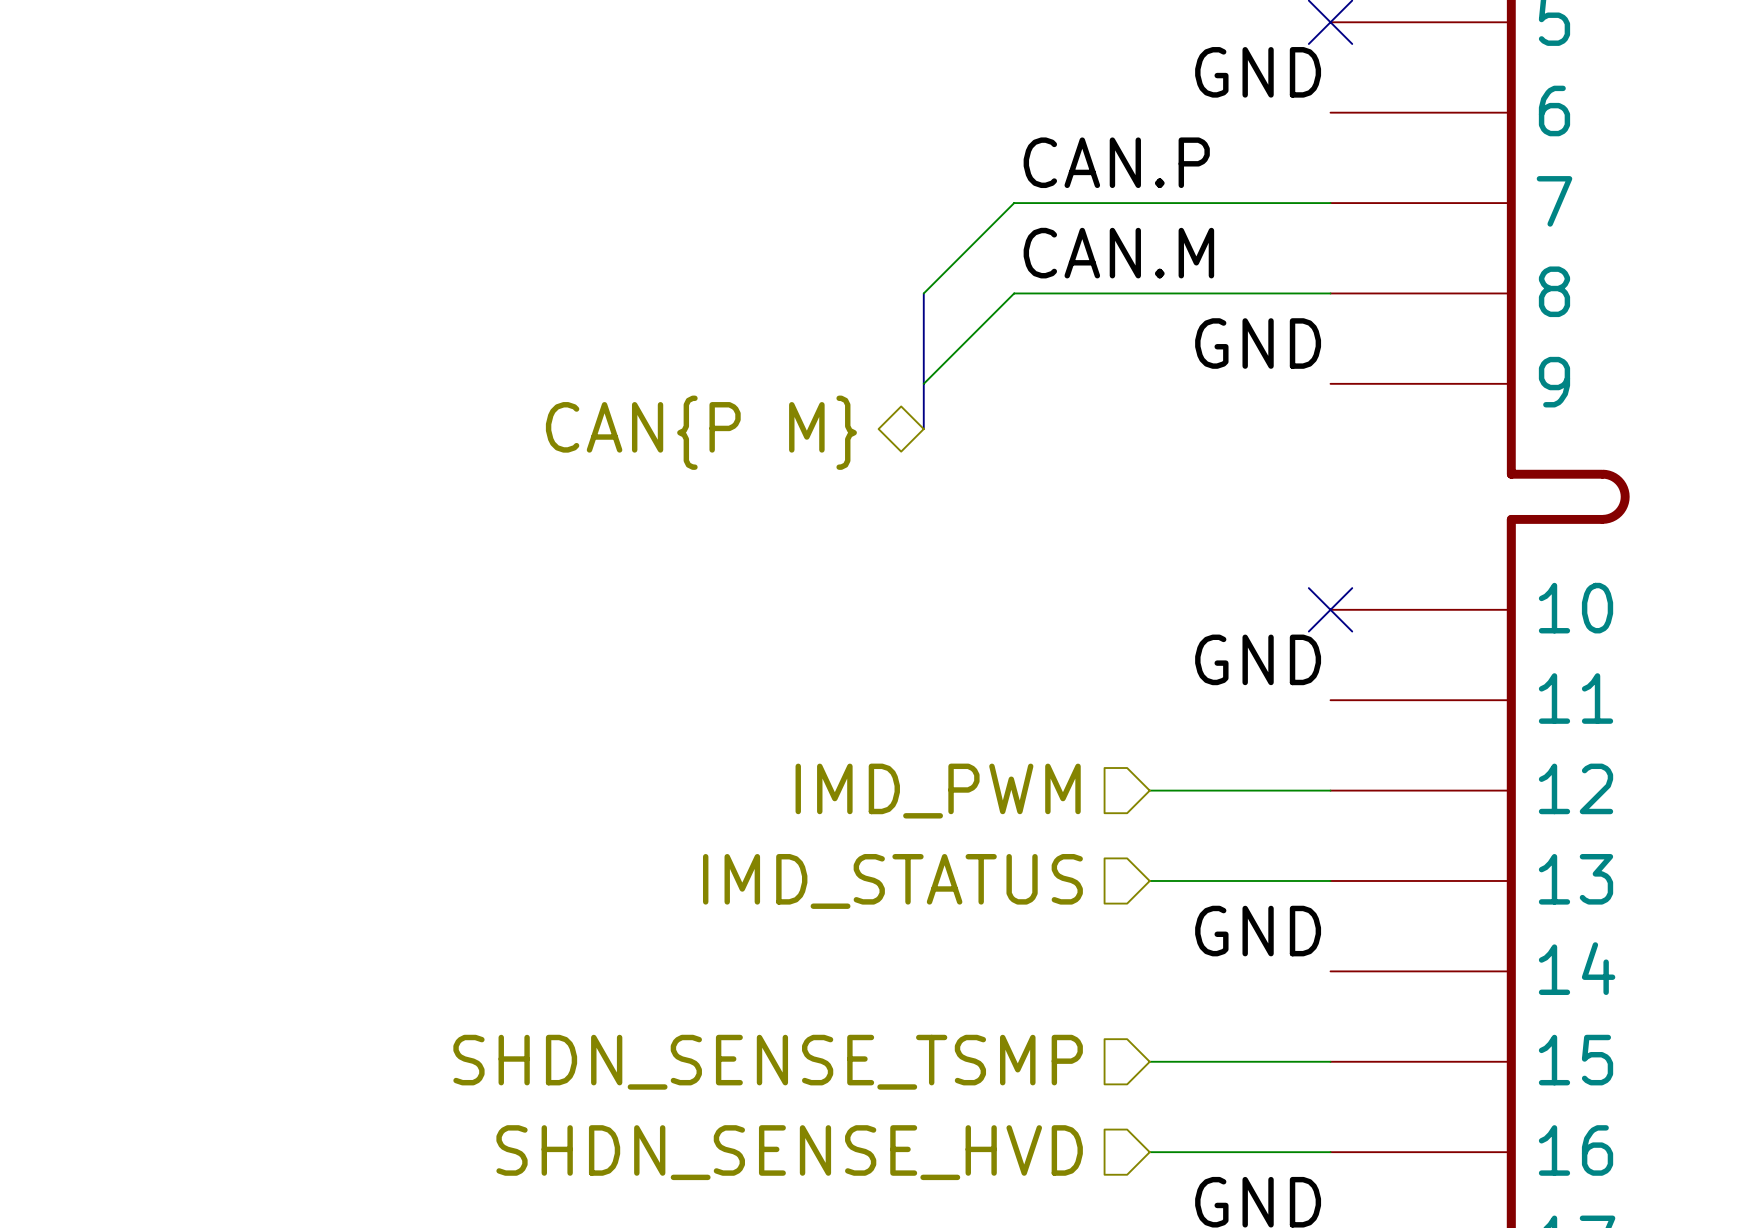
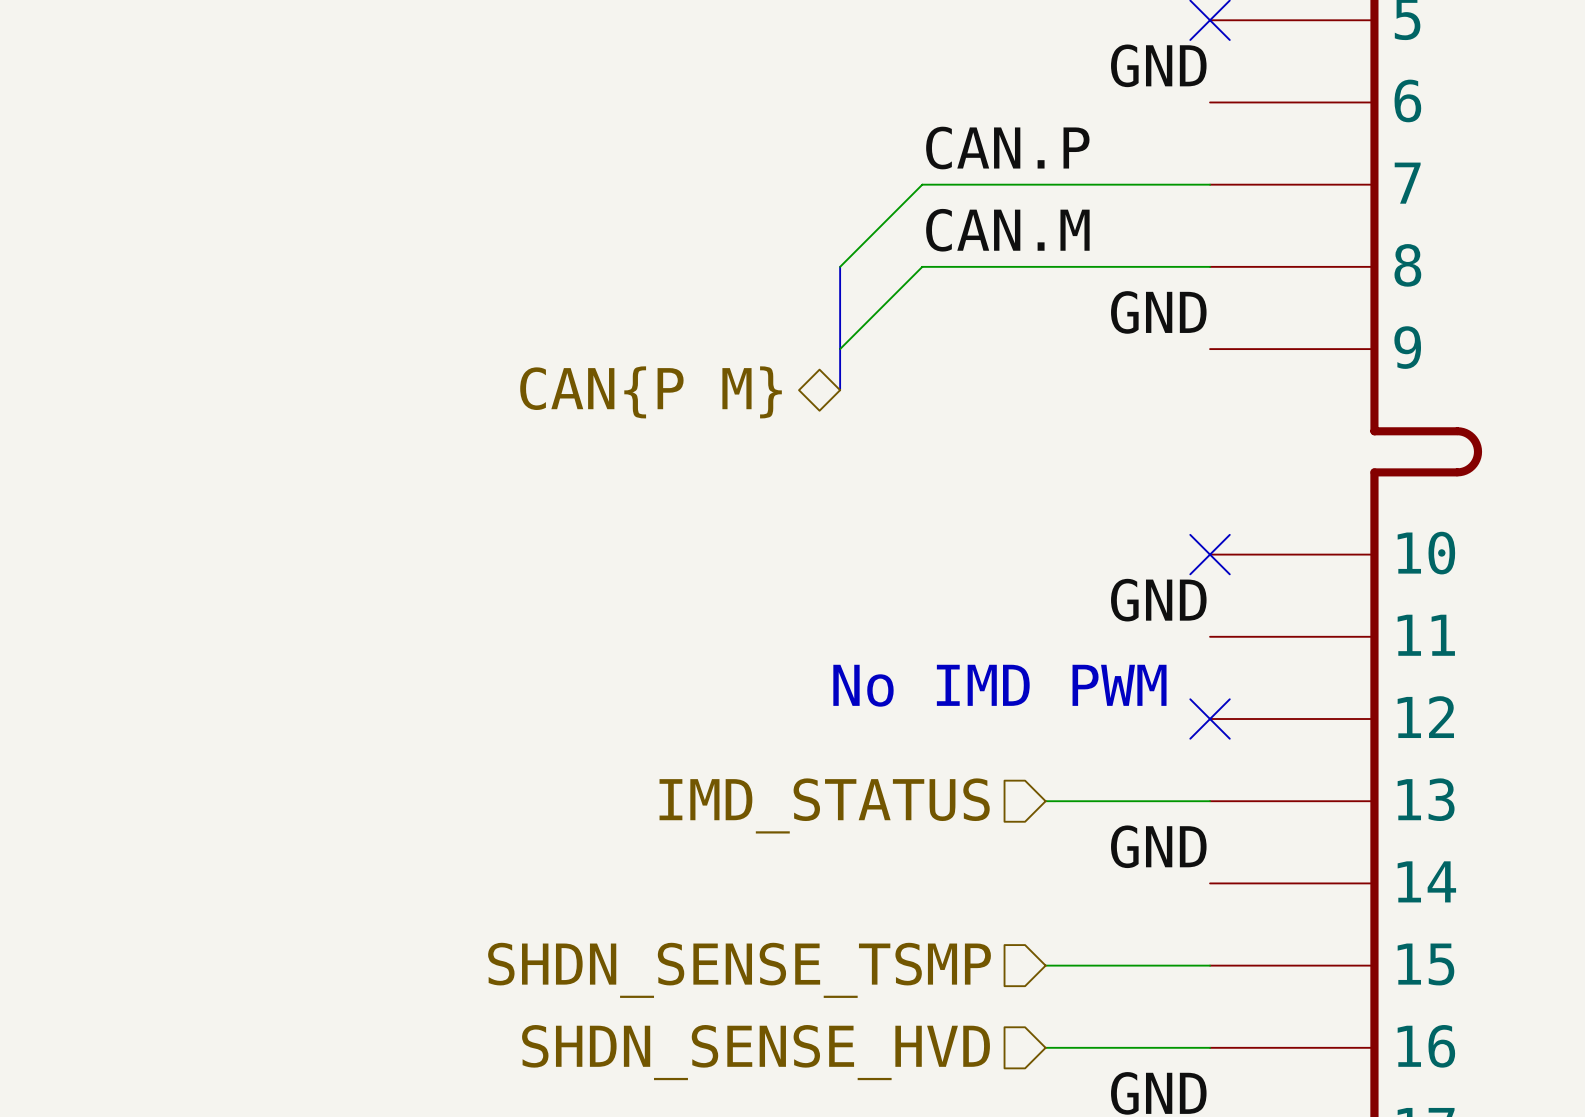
text: none -> No IMD PWM (999, 685)
wire: (1149, 790) (1330, 790) -> none
no-connect mark: none -> (1210, 719)
hierarchical label: IMD_PWM (938, 791) -> none

